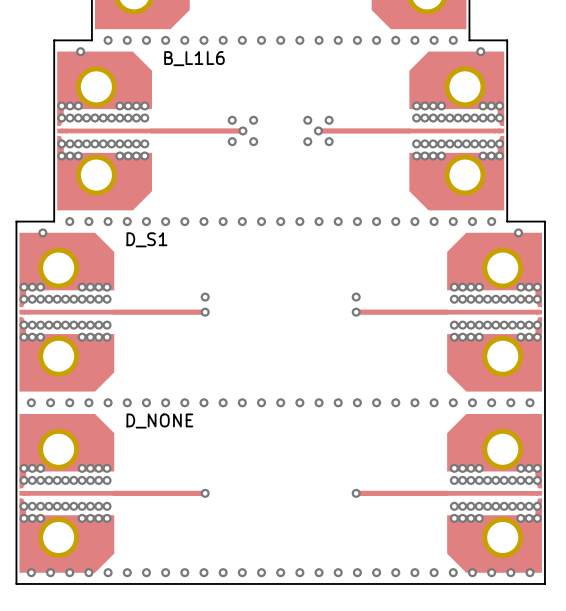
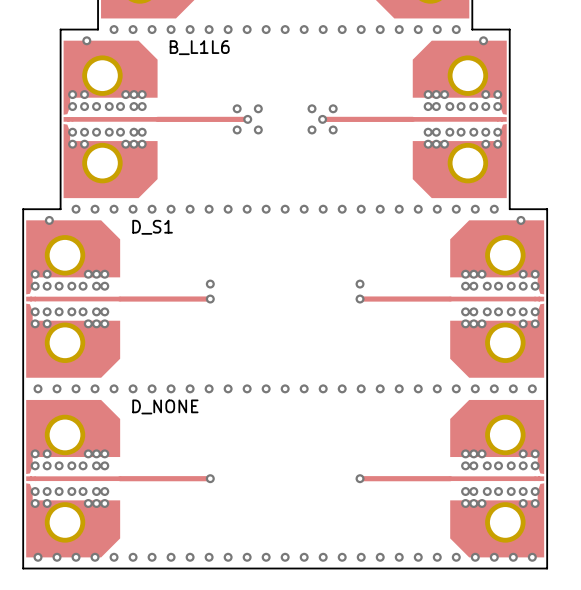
via: (61, 105) -> none
via: none -> (72, 94)
via: (70, 105) -> none
via: (144, 105) -> none
via: (416, 105) -> none
via: (491, 105) -> none
via: none -> (497, 94)
via: (499, 105) -> none
via: (61, 118) -> none
via: none -> (72, 106)
via: (70, 118) -> none
via: (86, 118) -> none
via: none -> (96, 106)
via: (94, 118) -> none
via: (111, 118) -> none
via: none -> (120, 106)
via: (119, 118) -> none
via: (144, 118) -> none
via: (416, 118) -> none
via: (441, 118) -> none
via: none -> (449, 106)
via: (449, 118) -> none
via: (466, 118) -> none
via: none -> (473, 106)
via: (474, 118) -> none
via: (491, 118) -> none
via: none -> (497, 106)
via: (499, 118) -> none
via: (61, 143) -> none
via: none -> (72, 132)
via: (70, 143) -> none
via: (86, 143) -> none
via: none -> (96, 132)
via: (94, 143) -> none
via: (111, 143) -> none
via: none -> (120, 132)
via: (119, 143) -> none
via: (144, 143) -> none
via: (416, 143) -> none
via: (441, 143) -> none
via: none -> (449, 132)
via: (449, 143) -> none
via: (466, 143) -> none
via: none -> (473, 132)
via: (474, 143) -> none
via: (491, 143) -> none
via: none -> (497, 132)
via: (499, 143) -> none
via: (61, 156) -> none
via: none -> (72, 144)
via: (70, 156) -> none
via: (144, 156) -> none
via: (416, 156) -> none
via: (491, 156) -> none
via: none -> (497, 144)
via: (499, 156) -> none
via: (23, 287) -> none
via: none -> (35, 274)
via: (32, 287) -> none
via: (107, 287) -> none
via: (454, 287) -> none
via: (529, 287) -> none
via: none -> (535, 274)
via: (537, 287) -> none
via: (23, 299) -> none
via: none -> (35, 286)
via: (32, 299) -> none
via: (48, 299) -> none
via: none -> (59, 286)
via: (57, 299) -> none
via: (73, 299) -> none
via: none -> (83, 286)
via: (82, 299) -> none
via: (107, 299) -> none
via: (454, 299) -> none
via: (479, 299) -> none
via: none -> (487, 286)
via: (487, 299) -> none
via: (504, 299) -> none
via: none -> (511, 286)
via: (512, 299) -> none
via: (529, 299) -> none
via: none -> (535, 286)
via: (537, 299) -> none
via: (23, 325) -> none
via: none -> (35, 311)
via: (32, 325) -> none
via: (48, 325) -> none
via: none -> (59, 311)
via: (57, 325) -> none
via: (73, 325) -> none
via: none -> (83, 311)
via: (82, 325) -> none
via: (107, 325) -> none
via: (454, 325) -> none
via: (479, 325) -> none
via: none -> (487, 311)
via: (487, 325) -> none
via: (504, 325) -> none
via: none -> (511, 311)
via: (512, 325) -> none
via: (529, 325) -> none
via: none -> (535, 311)
via: (537, 325) -> none
via: (23, 337) -> none
via: none -> (35, 323)
via: (32, 337) -> none
via: (107, 337) -> none
via: (454, 337) -> none
via: (529, 337) -> none
via: none -> (535, 323)
via: (537, 337) -> none
via: (23, 468) -> none
via: none -> (35, 453)
via: (32, 468) -> none
via: (107, 468) -> none
via: (454, 468) -> none
via: (529, 468) -> none
via: none -> (535, 453)
via: (537, 468) -> none
via: (23, 480) -> none
via: none -> (35, 465)
via: (32, 480) -> none
via: (48, 480) -> none
via: none -> (59, 465)
via: (57, 480) -> none
via: (73, 480) -> none
via: none -> (83, 465)
via: (82, 480) -> none
via: (107, 480) -> none
via: (454, 480) -> none
via: (479, 480) -> none
via: none -> (487, 465)
via: (487, 480) -> none
via: (504, 480) -> none
via: none -> (511, 465)
via: (512, 480) -> none
via: (529, 480) -> none
via: none -> (535, 465)
via: (537, 480) -> none
via: (23, 506) -> none
via: none -> (35, 491)
via: (32, 506) -> none
via: (48, 506) -> none
via: none -> (59, 491)
via: (57, 506) -> none
via: (73, 506) -> none
via: none -> (83, 491)
via: (82, 506) -> none
via: (107, 506) -> none
via: (454, 506) -> none
via: (479, 506) -> none
via: none -> (487, 491)
via: (487, 506) -> none
via: (504, 506) -> none
via: none -> (511, 491)
via: (512, 506) -> none
via: (529, 506) -> none
via: none -> (535, 491)
via: (537, 506) -> none
via: (23, 518) -> none
via: none -> (35, 503)
via: (32, 518) -> none
via: (107, 518) -> none
via: (454, 518) -> none
via: (529, 518) -> none
via: none -> (535, 503)
via: (537, 518) -> none

